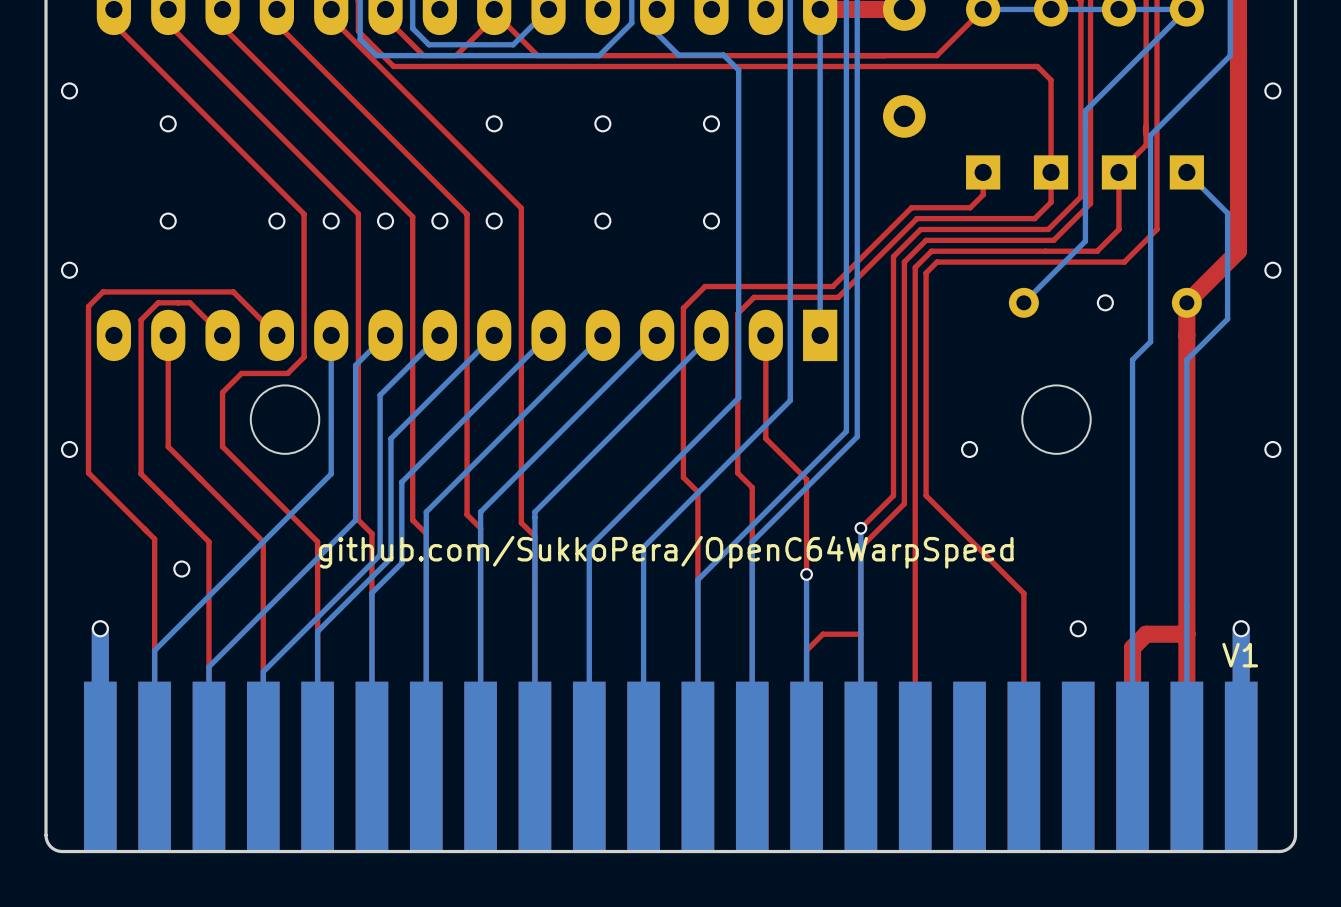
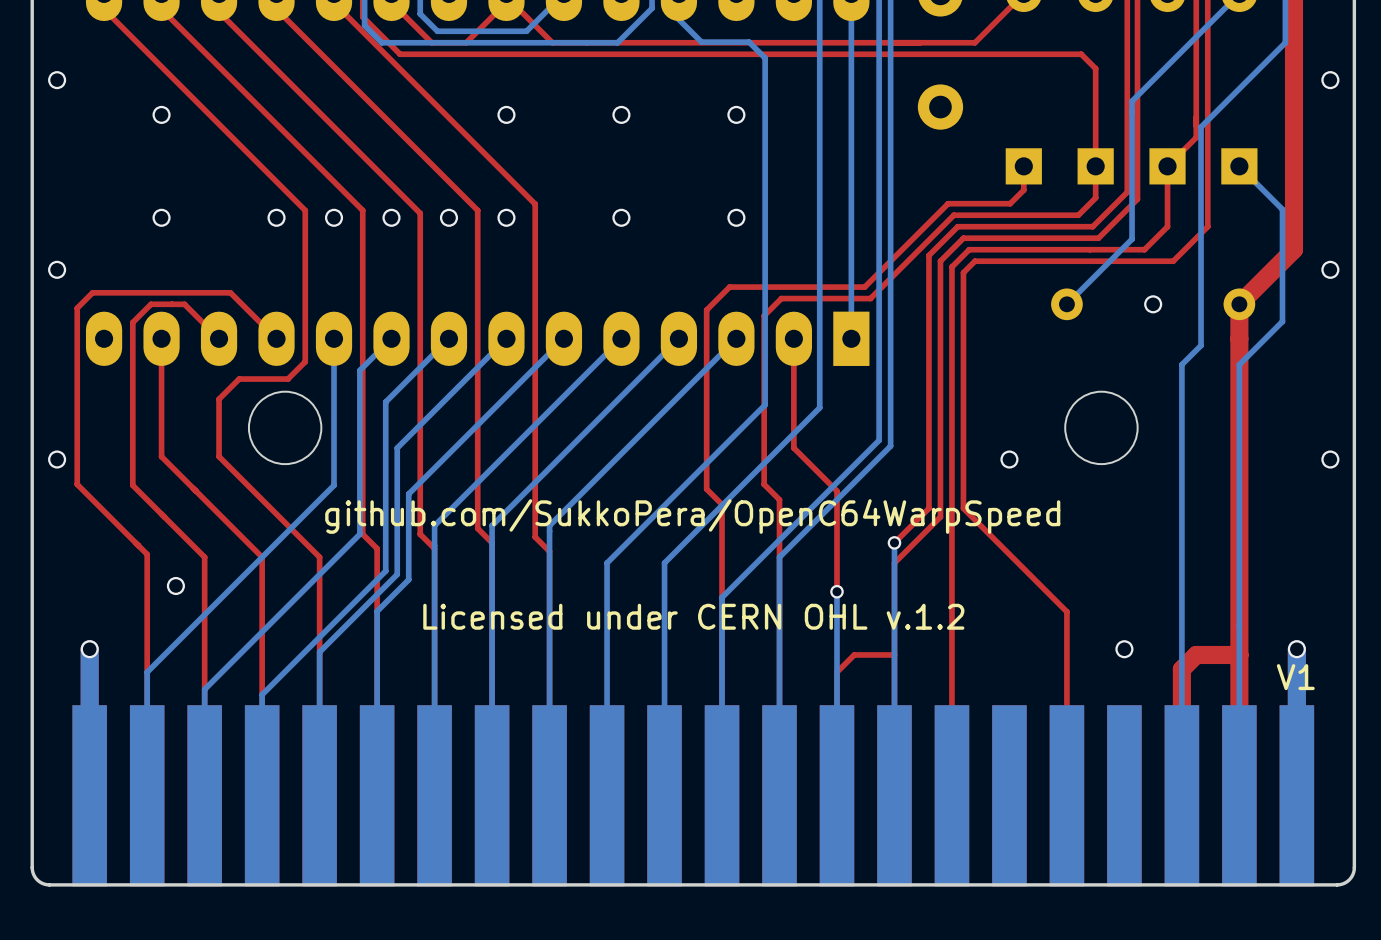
text position: github.com/SukkoPera/OpenC64WarpSpeed (666, 552) -> github.com/SukkoPera/OpenC64WarpSpeed (692, 516)
text: none -> Licensed under CERN OHL v.1.2 (693, 616)

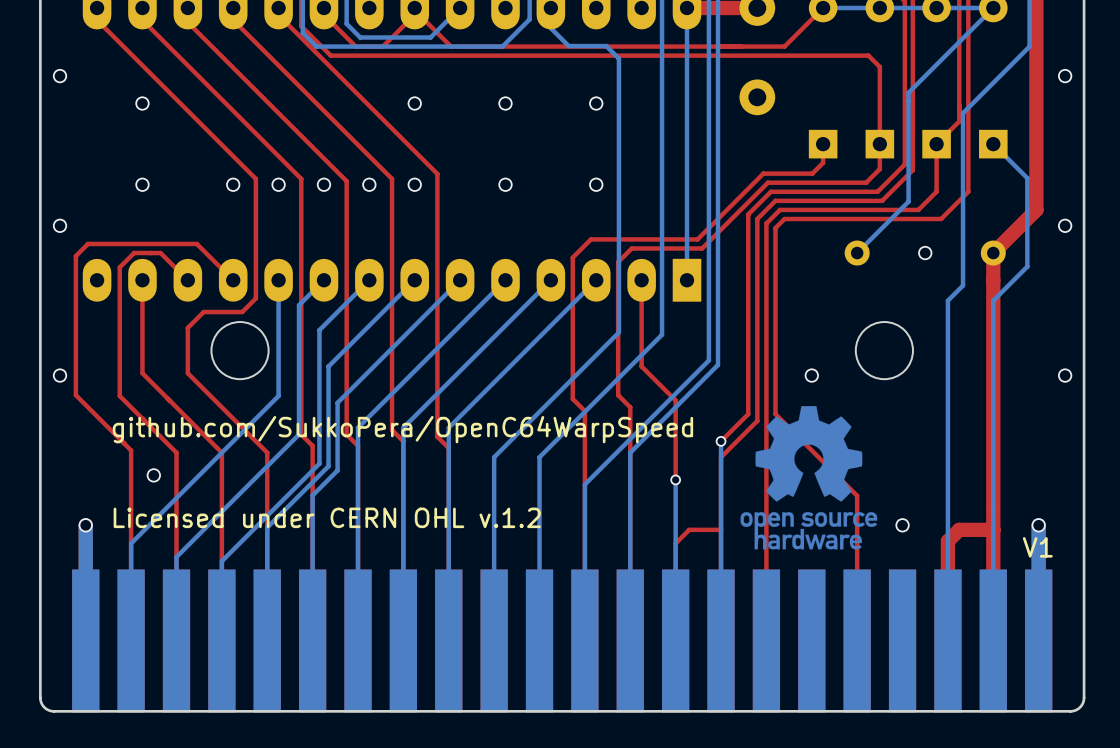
drawing: none -> [740, 406, 878, 550]
text position: github.com/SukkoPera/OpenC64WarpSpeed (692, 516) -> github.com/SukkoPera/OpenC64WarpSpeed (402, 429)
text position: Licensed under CERN OHL v.1.2 (693, 616) -> Licensed under CERN OHL v.1.2 (327, 517)

